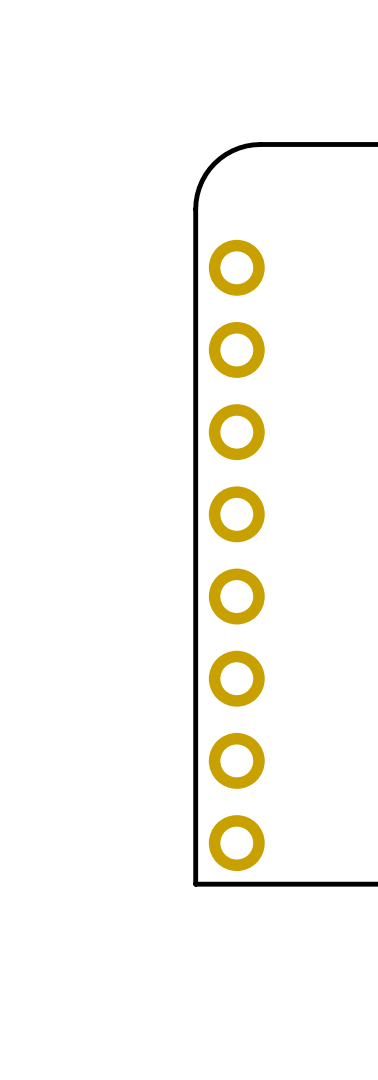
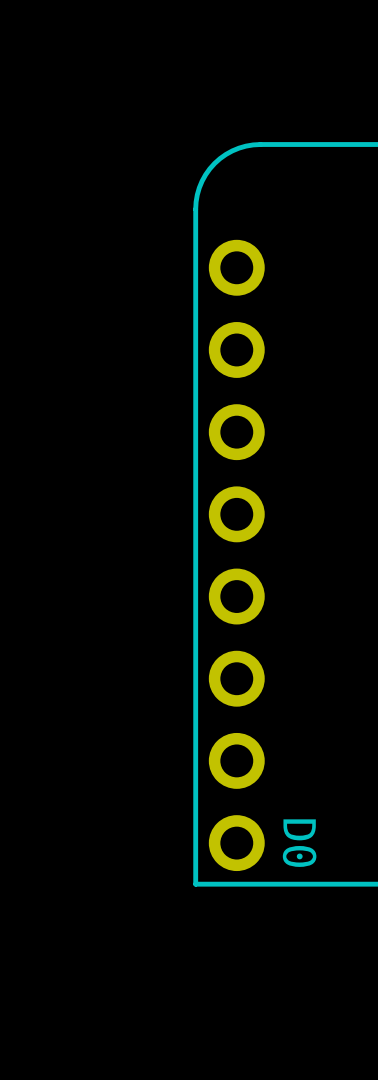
part text: none -> D0 (299, 843)

